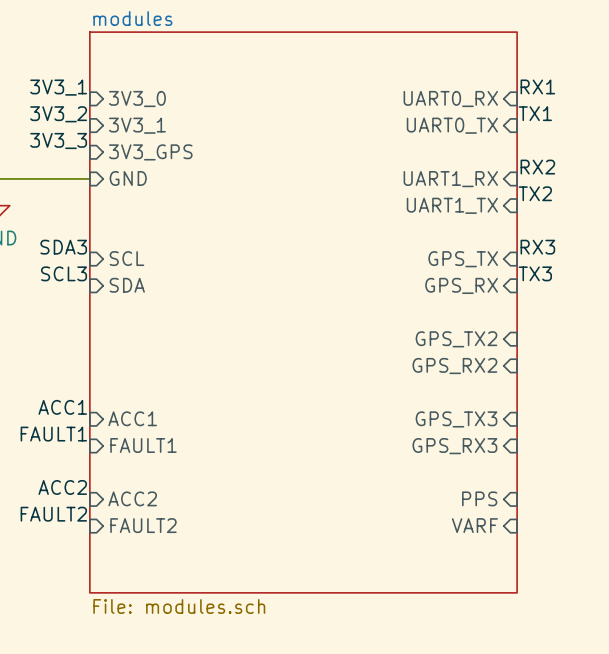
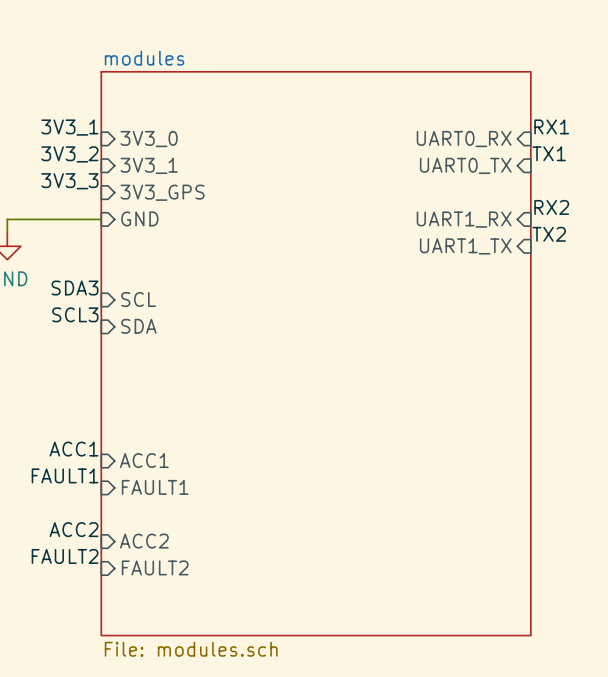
label: RX3 (537, 247) -> none
sheet pin: GPS_TX (463, 259) -> none
label: TX3 (535, 273) -> none
sheet pin: GPS_RX (461, 285) -> none
sheet pin: GPS_TX2 (456, 339) -> none
sheet pin: GPS_RX2 (454, 366) -> none
sheet pin: GPS_TX3 (456, 419) -> none
sheet pin: GPS_RX3 (454, 446) -> none
sheet pin: PPS (479, 498) -> none
sheet pin: VARF (474, 525) -> none

